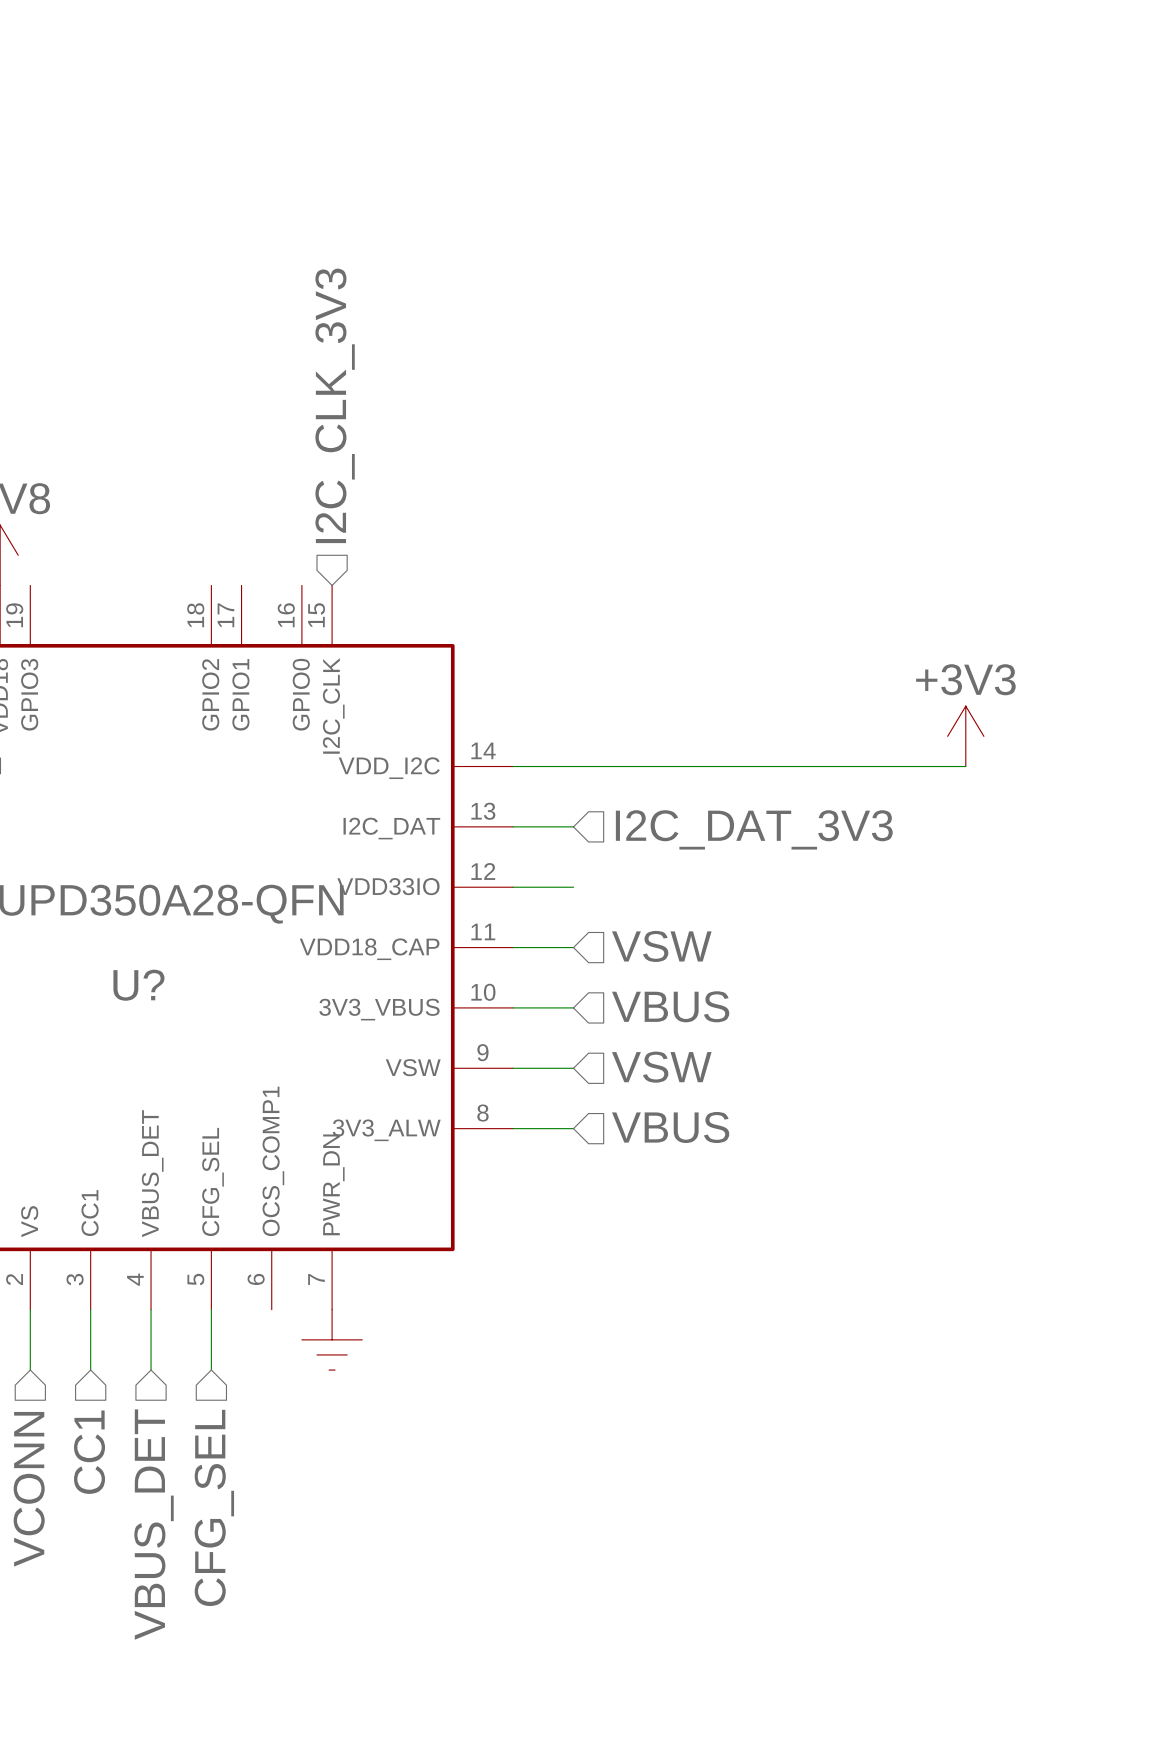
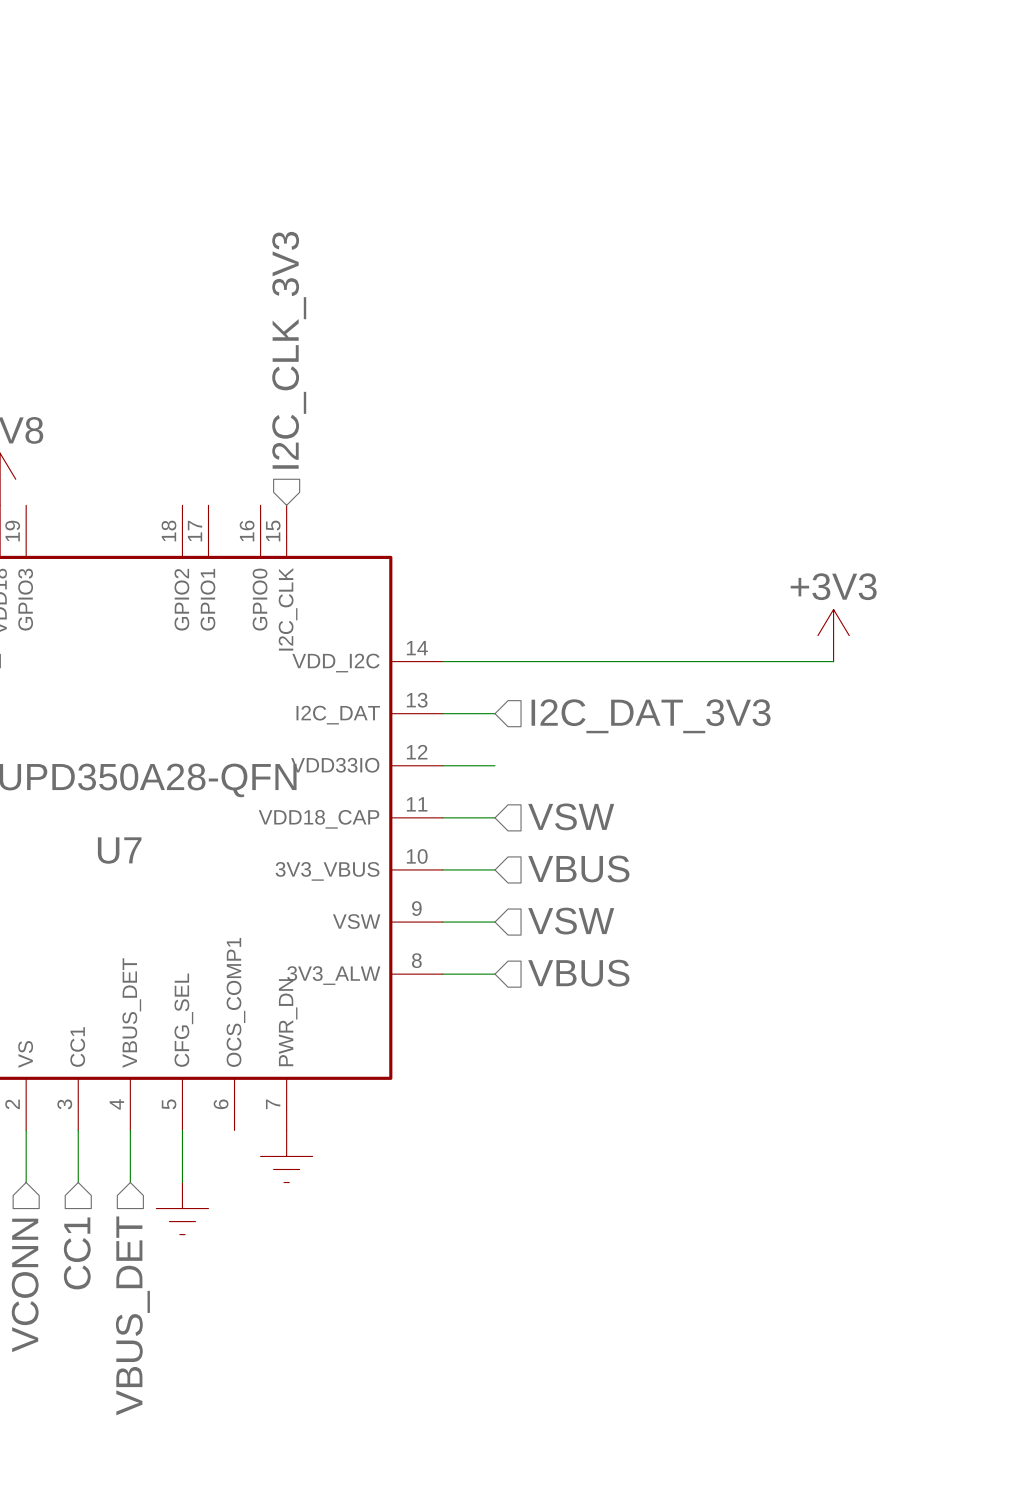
U? name: U? (138, 985) -> U7 (119, 850)
power symbol: none -> (182, 1208)
hierarchical label: CFG_SEL (214, 1507) -> none

